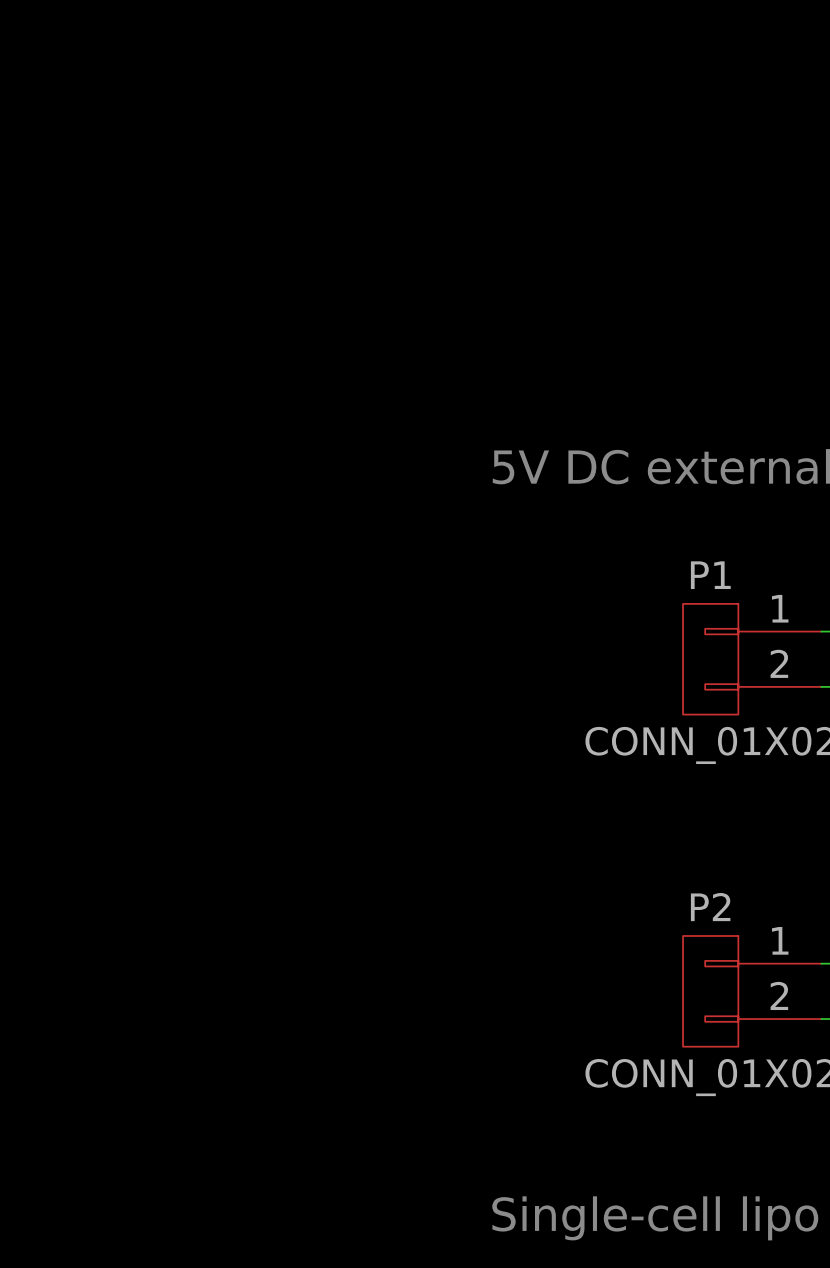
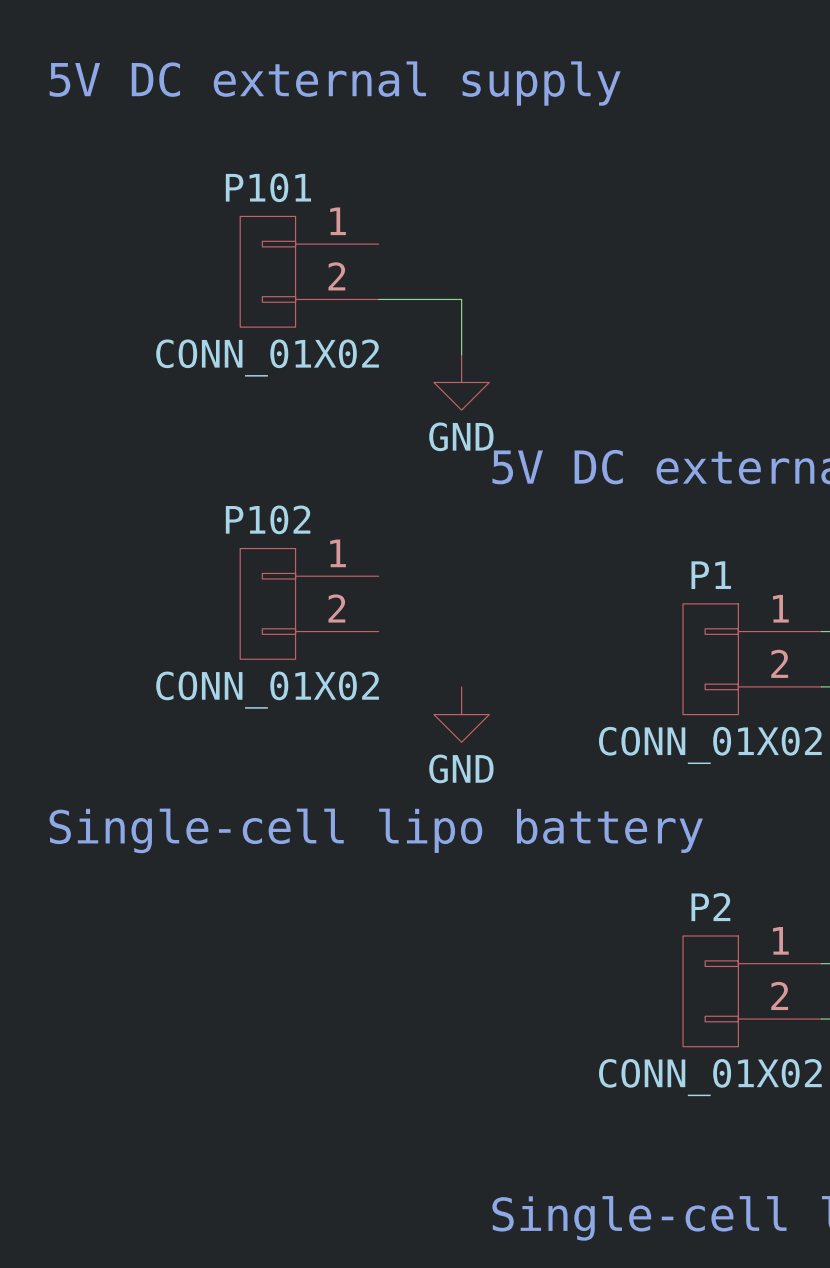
text: none -> 5V DC external supply (335, 83)
P101: none -> CONN_01X02 (309, 271)
wire: none -> (378, 299) (461, 299) (461, 354)
power symbol: none -> GND (461, 382)
P102: none -> CONN_01X02 (309, 603)
power symbol: none -> GND (461, 714)
text: none -> Single-cell lipo battery (376, 830)

